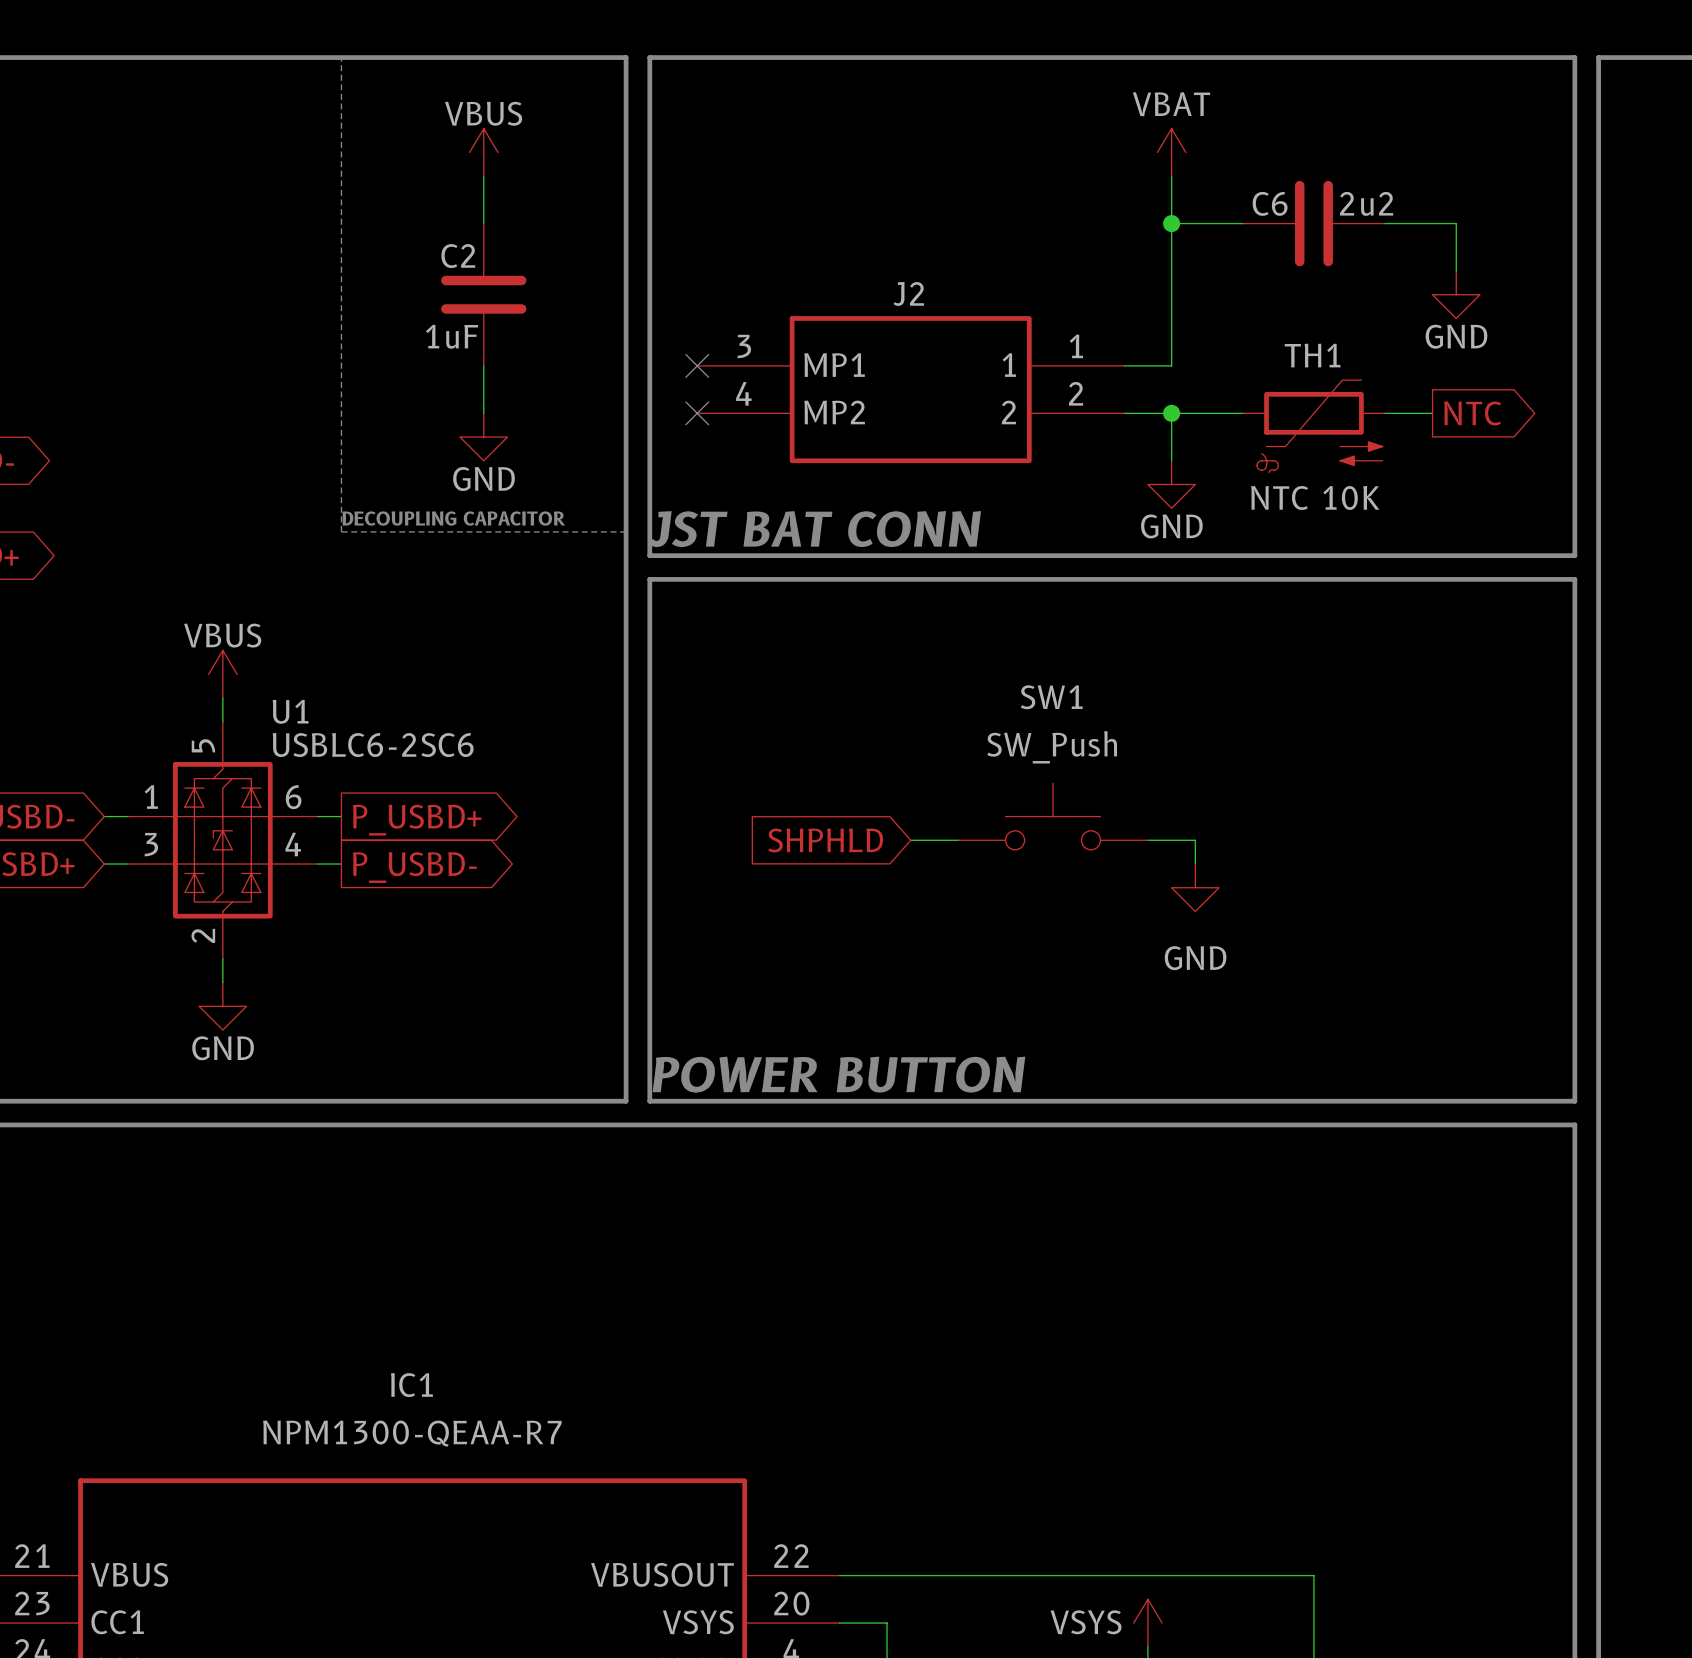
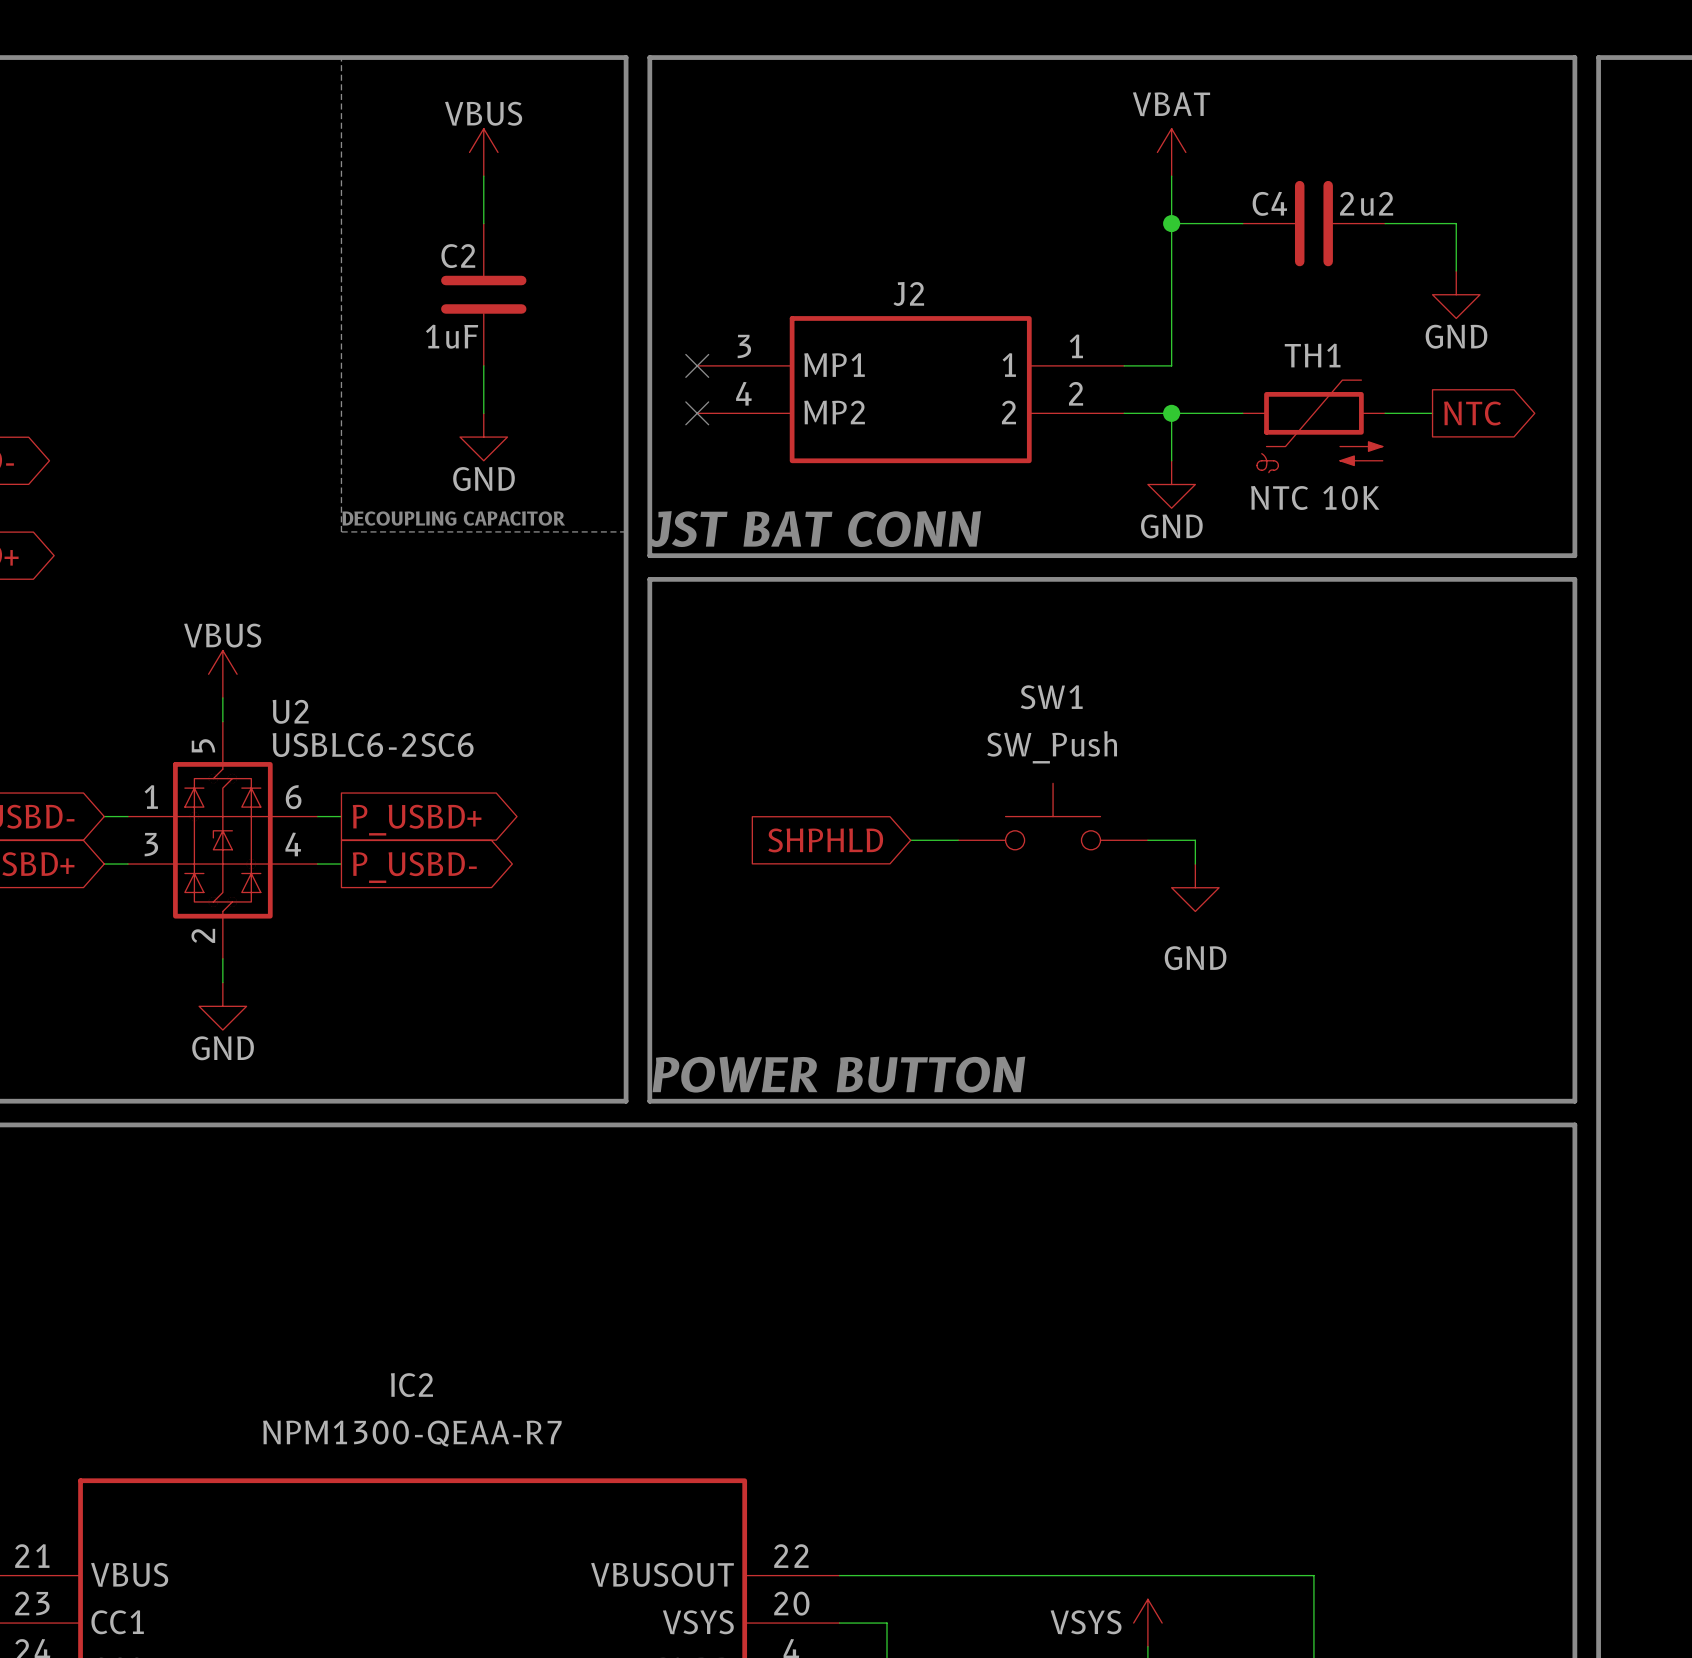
C6 name: C6 (1270, 203) -> C4 (1269, 203)
U1 name: U1 (290, 711) -> U2 (290, 711)
IC1 name: IC1 (411, 1385) -> IC2 (411, 1385)

